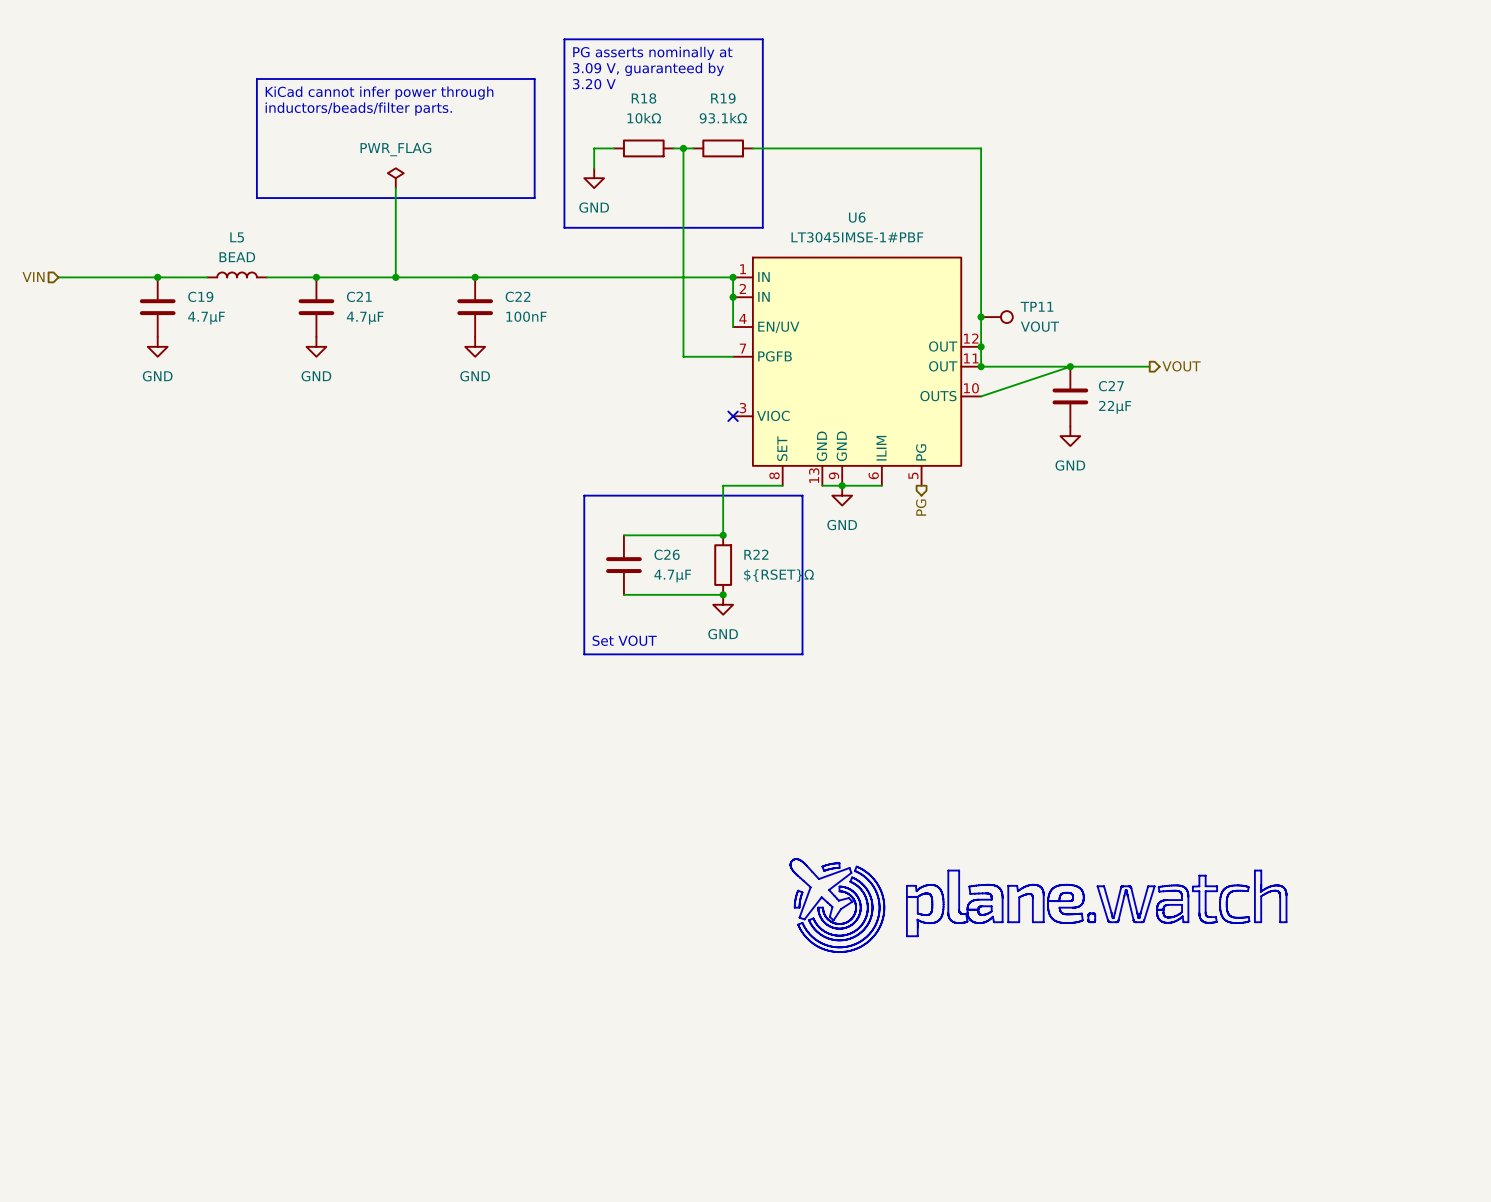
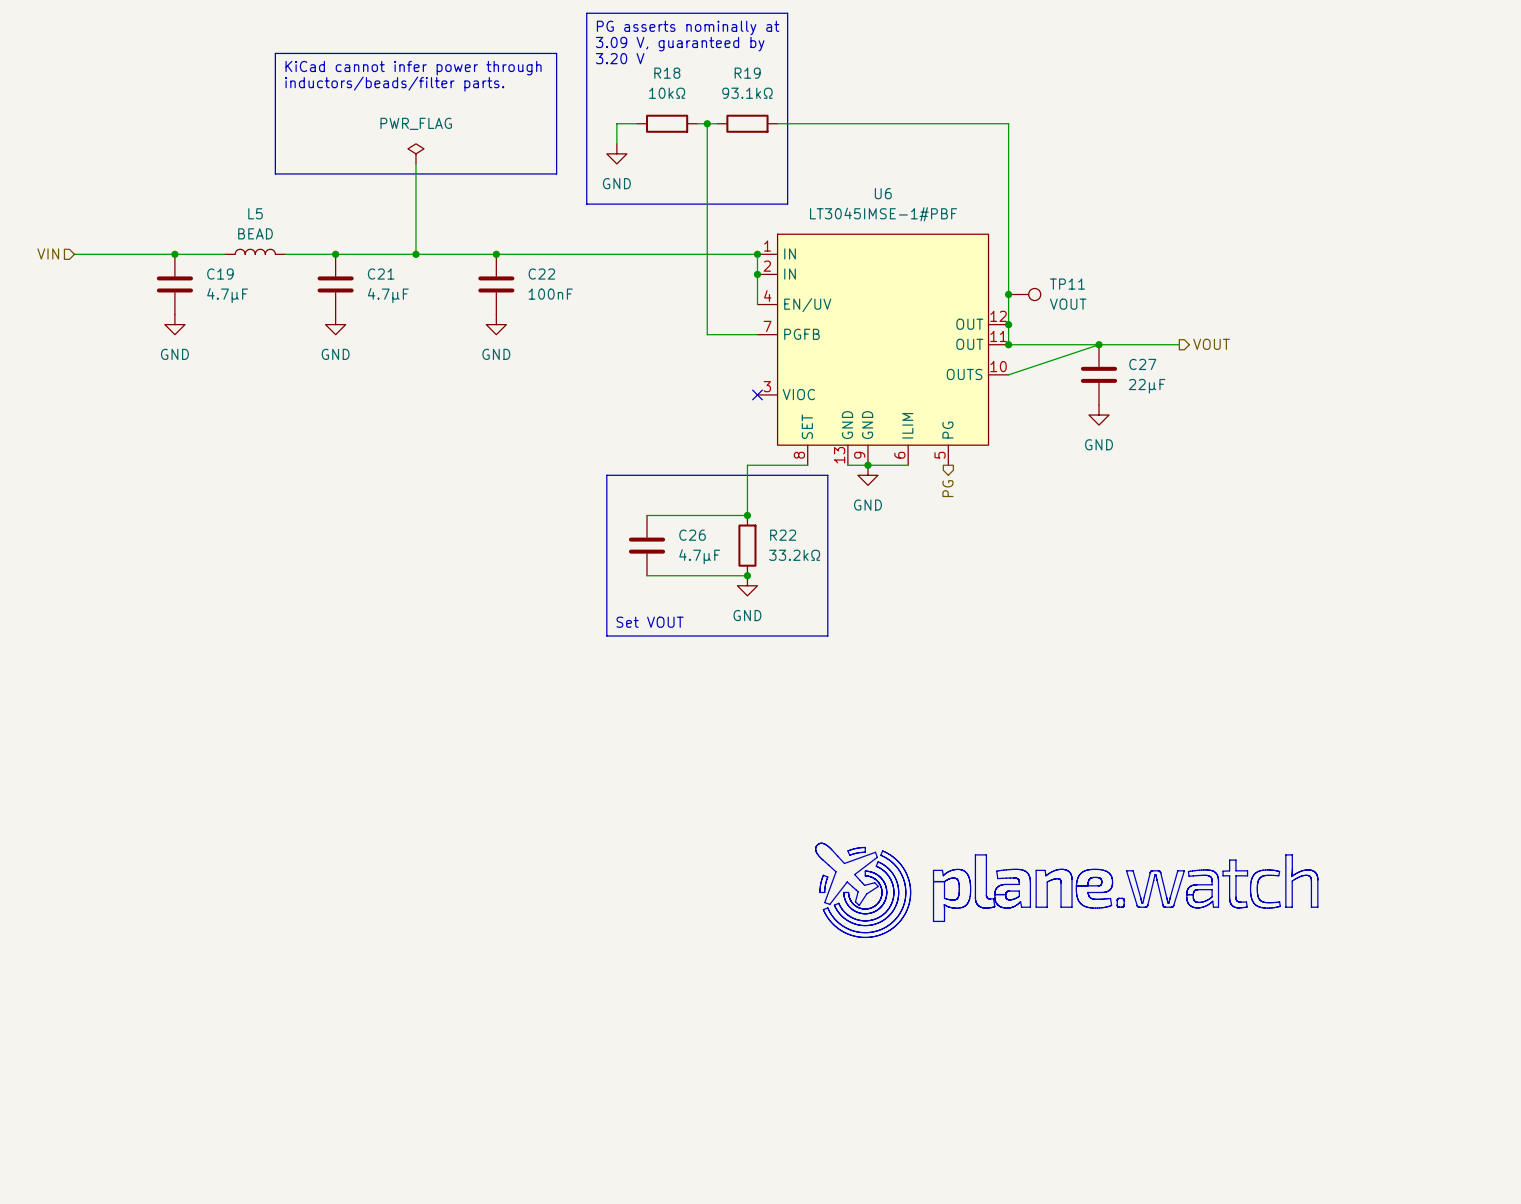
R22 value: ${RSET}Ω (778, 575) -> 33.2kΩ (794, 555)

